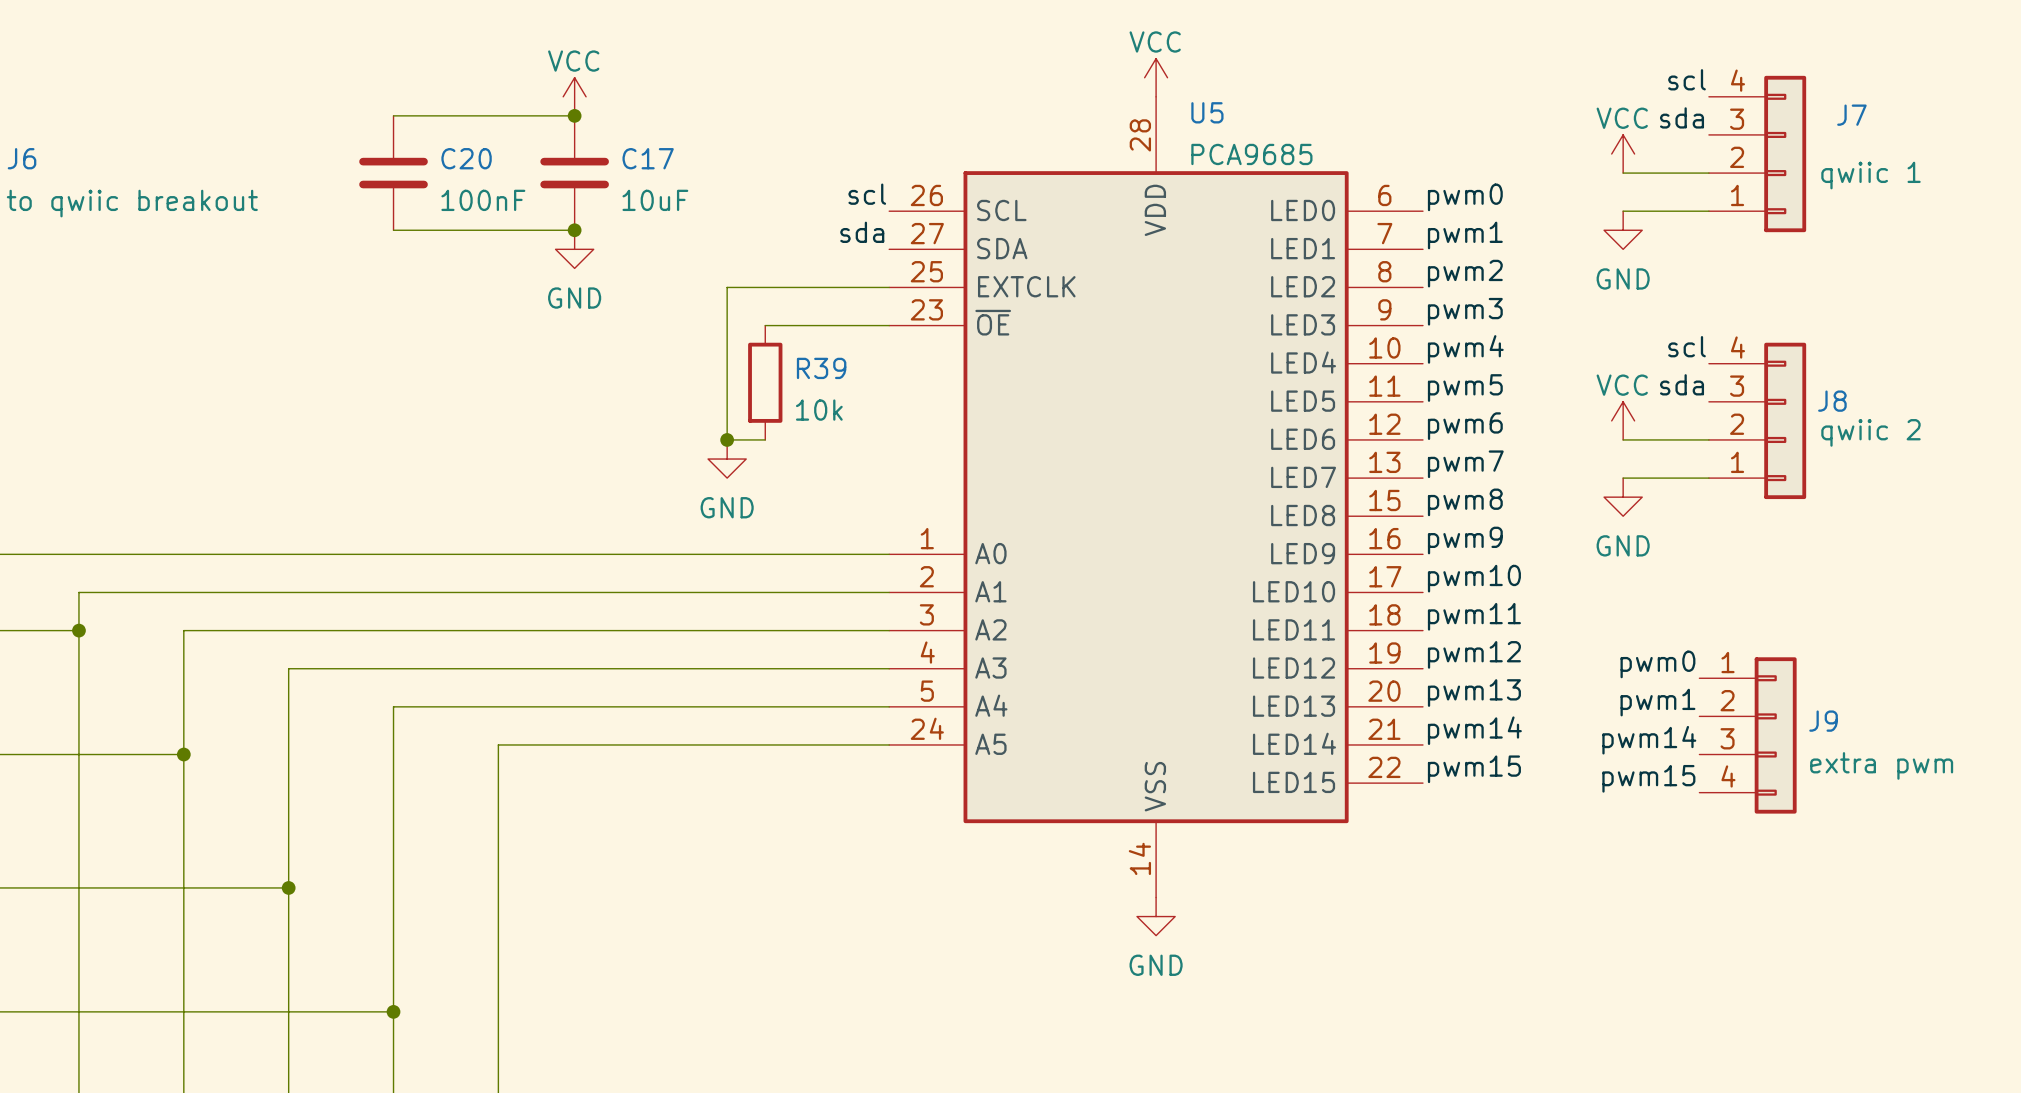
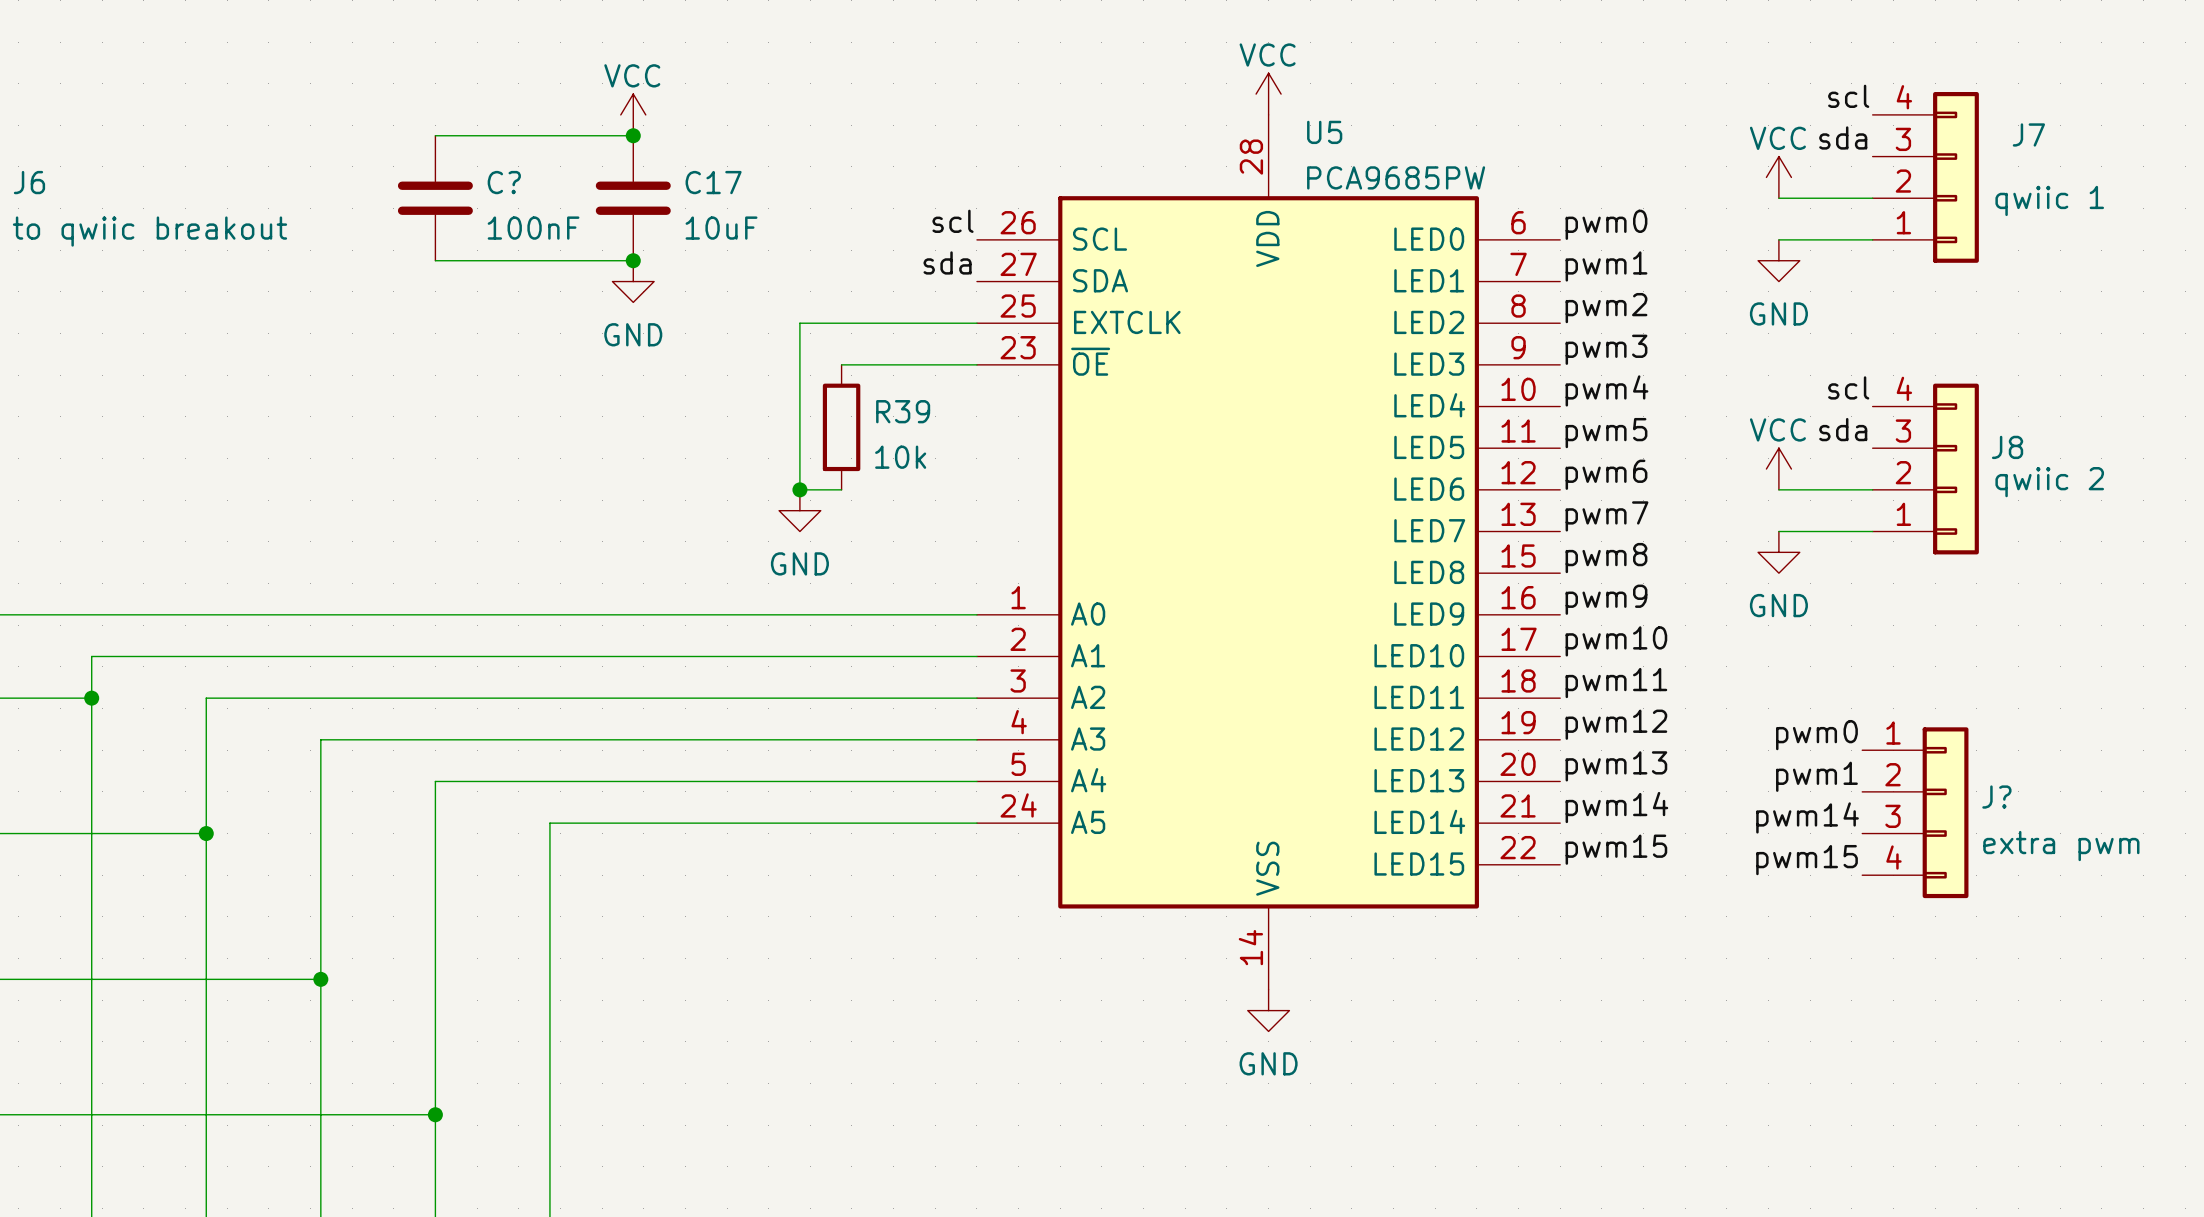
U5 value: PCA9685 (1251, 154) -> PCA9685PW (1396, 177)
C20 name: C20 (466, 158) -> C? (504, 182)
J9 name: J9 (1823, 721) -> J? (1996, 797)

